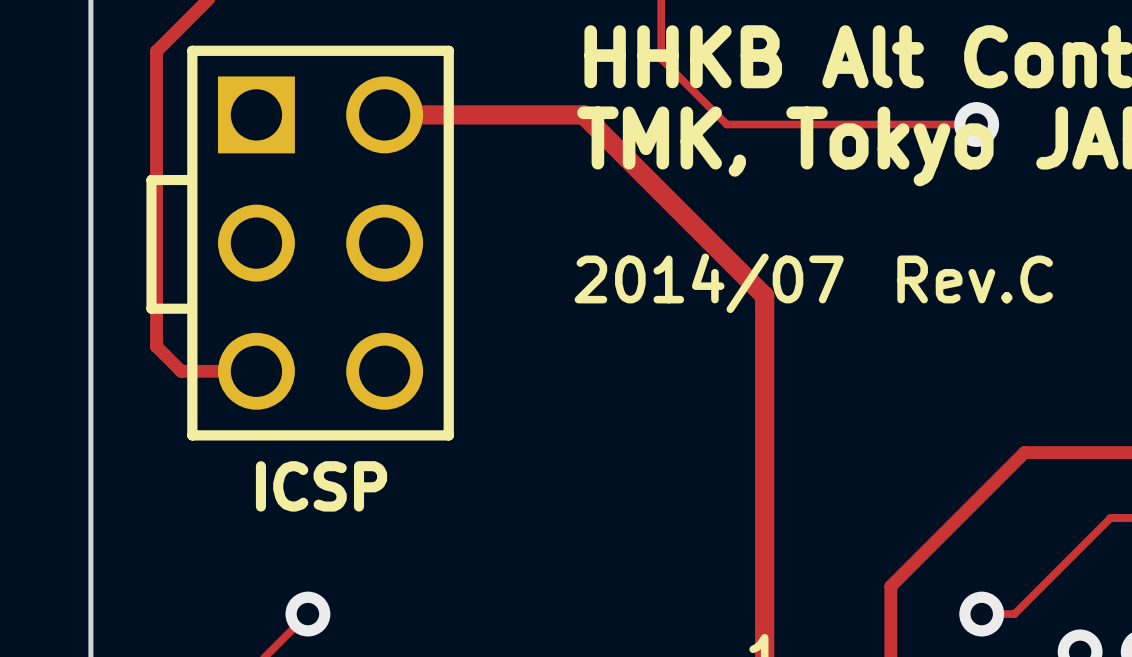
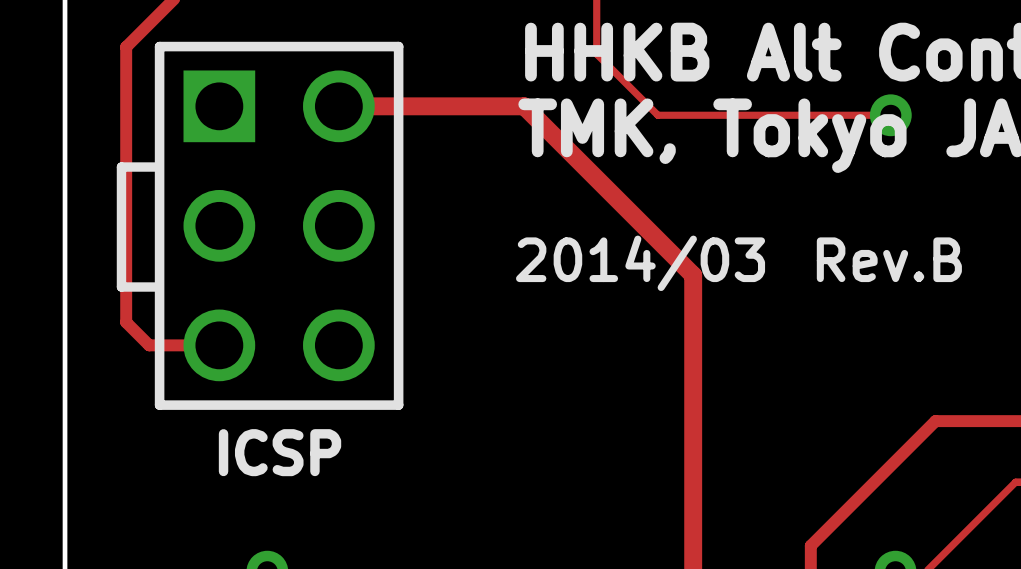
text: Rev.C (975, 279) -> Rev.B (889, 259)
text: 2014/07 (709, 283) -> 2014/03 (640, 263)

